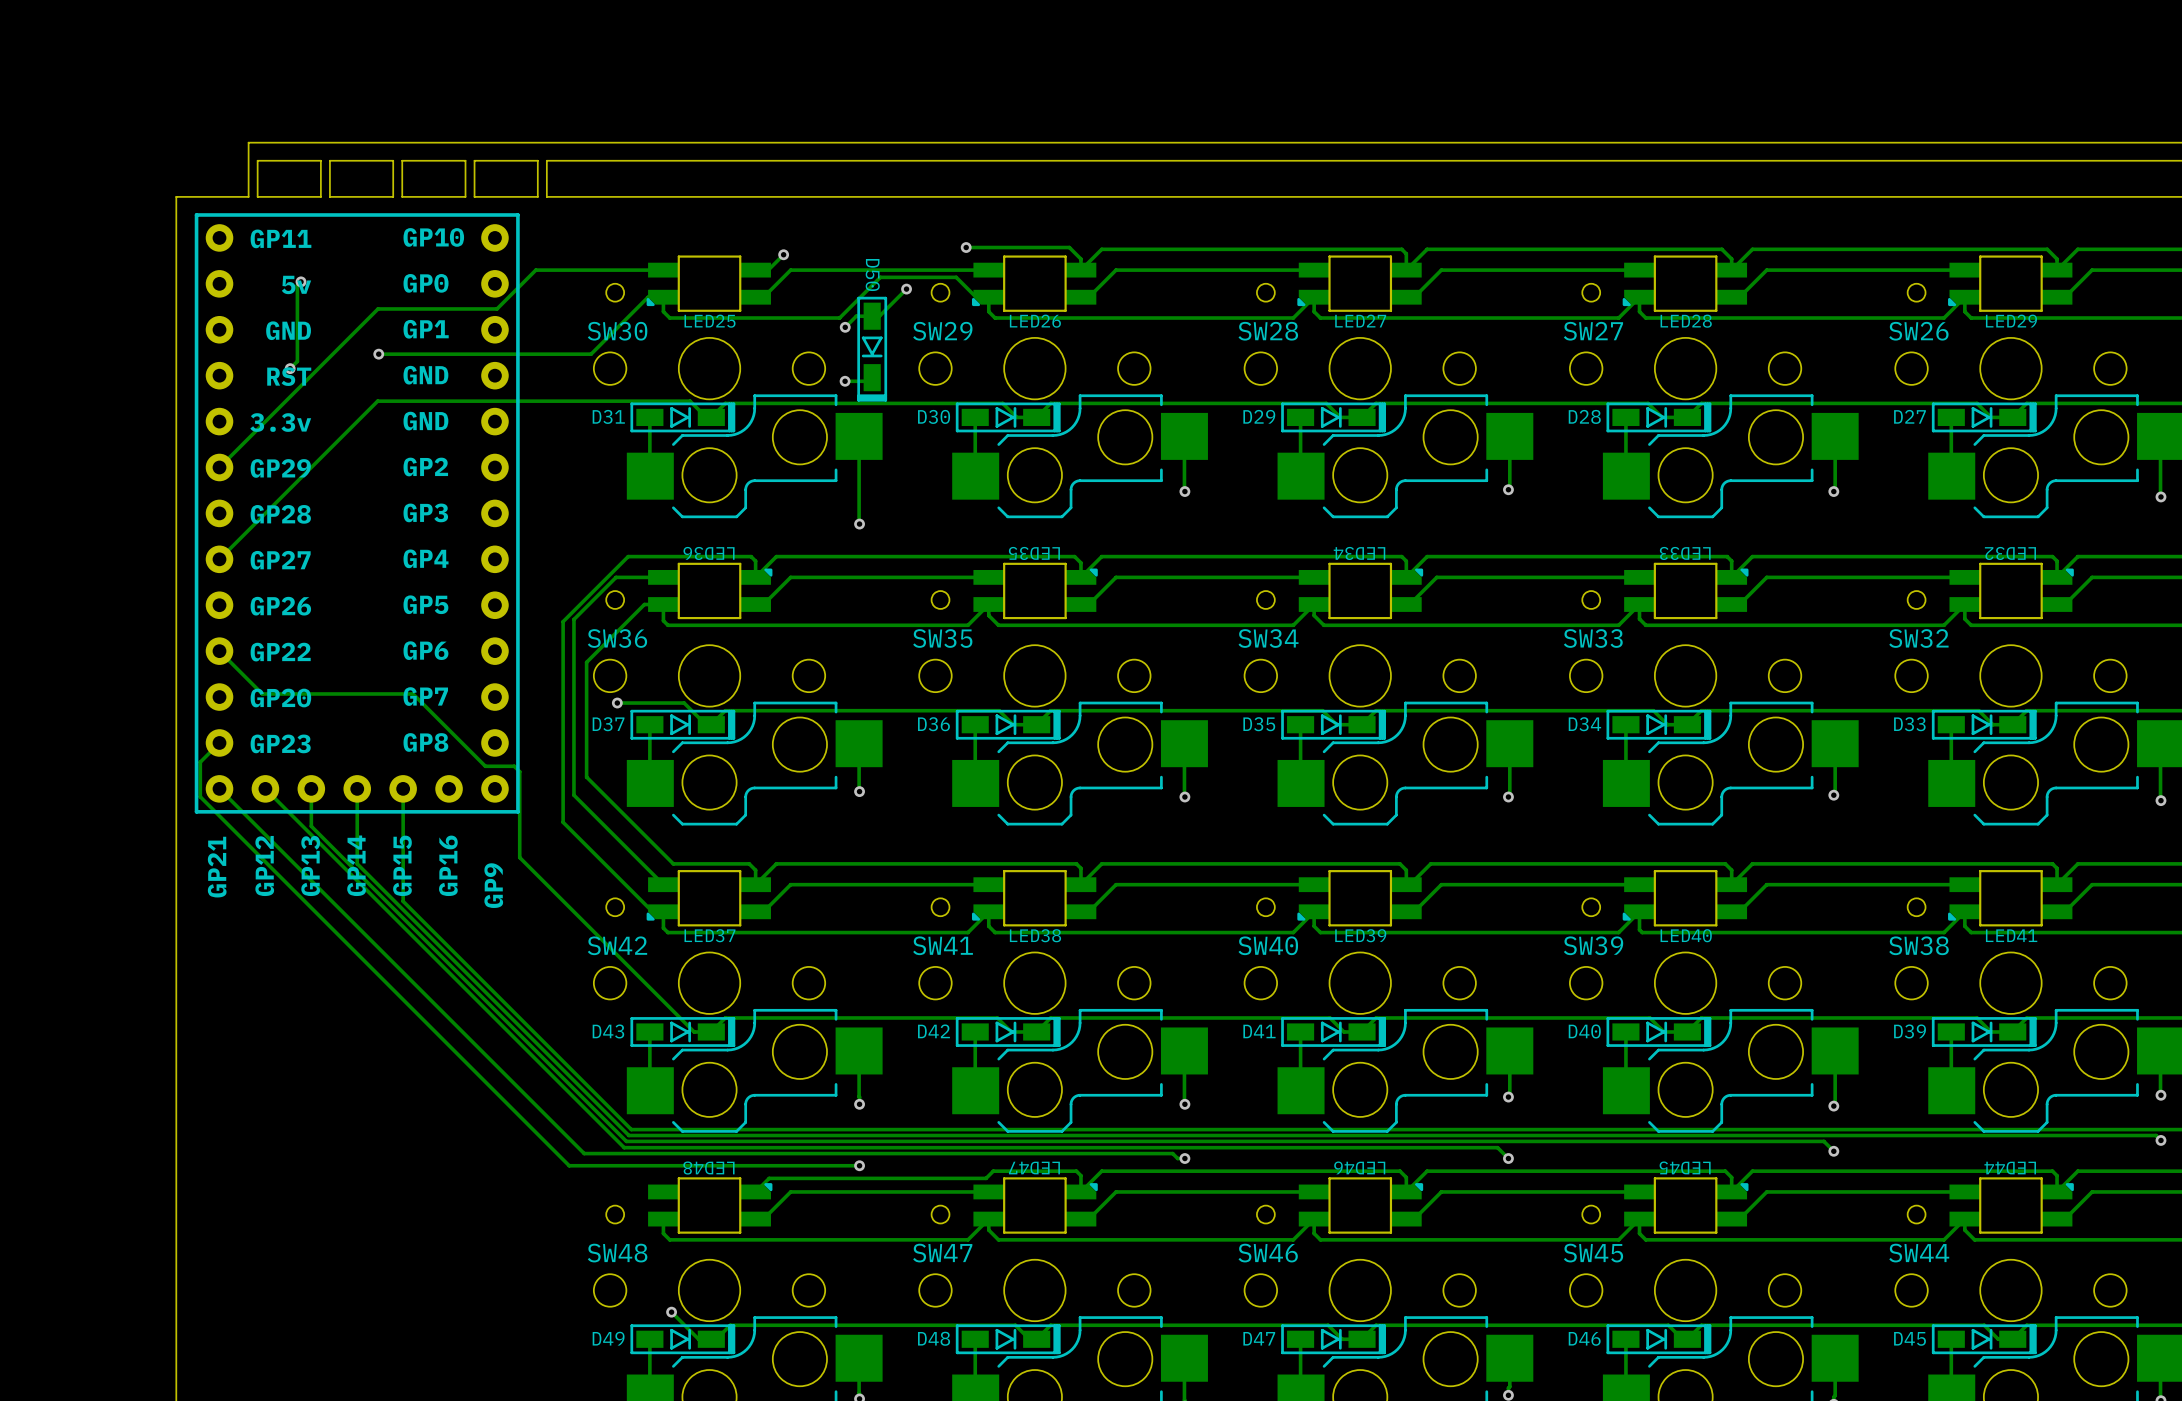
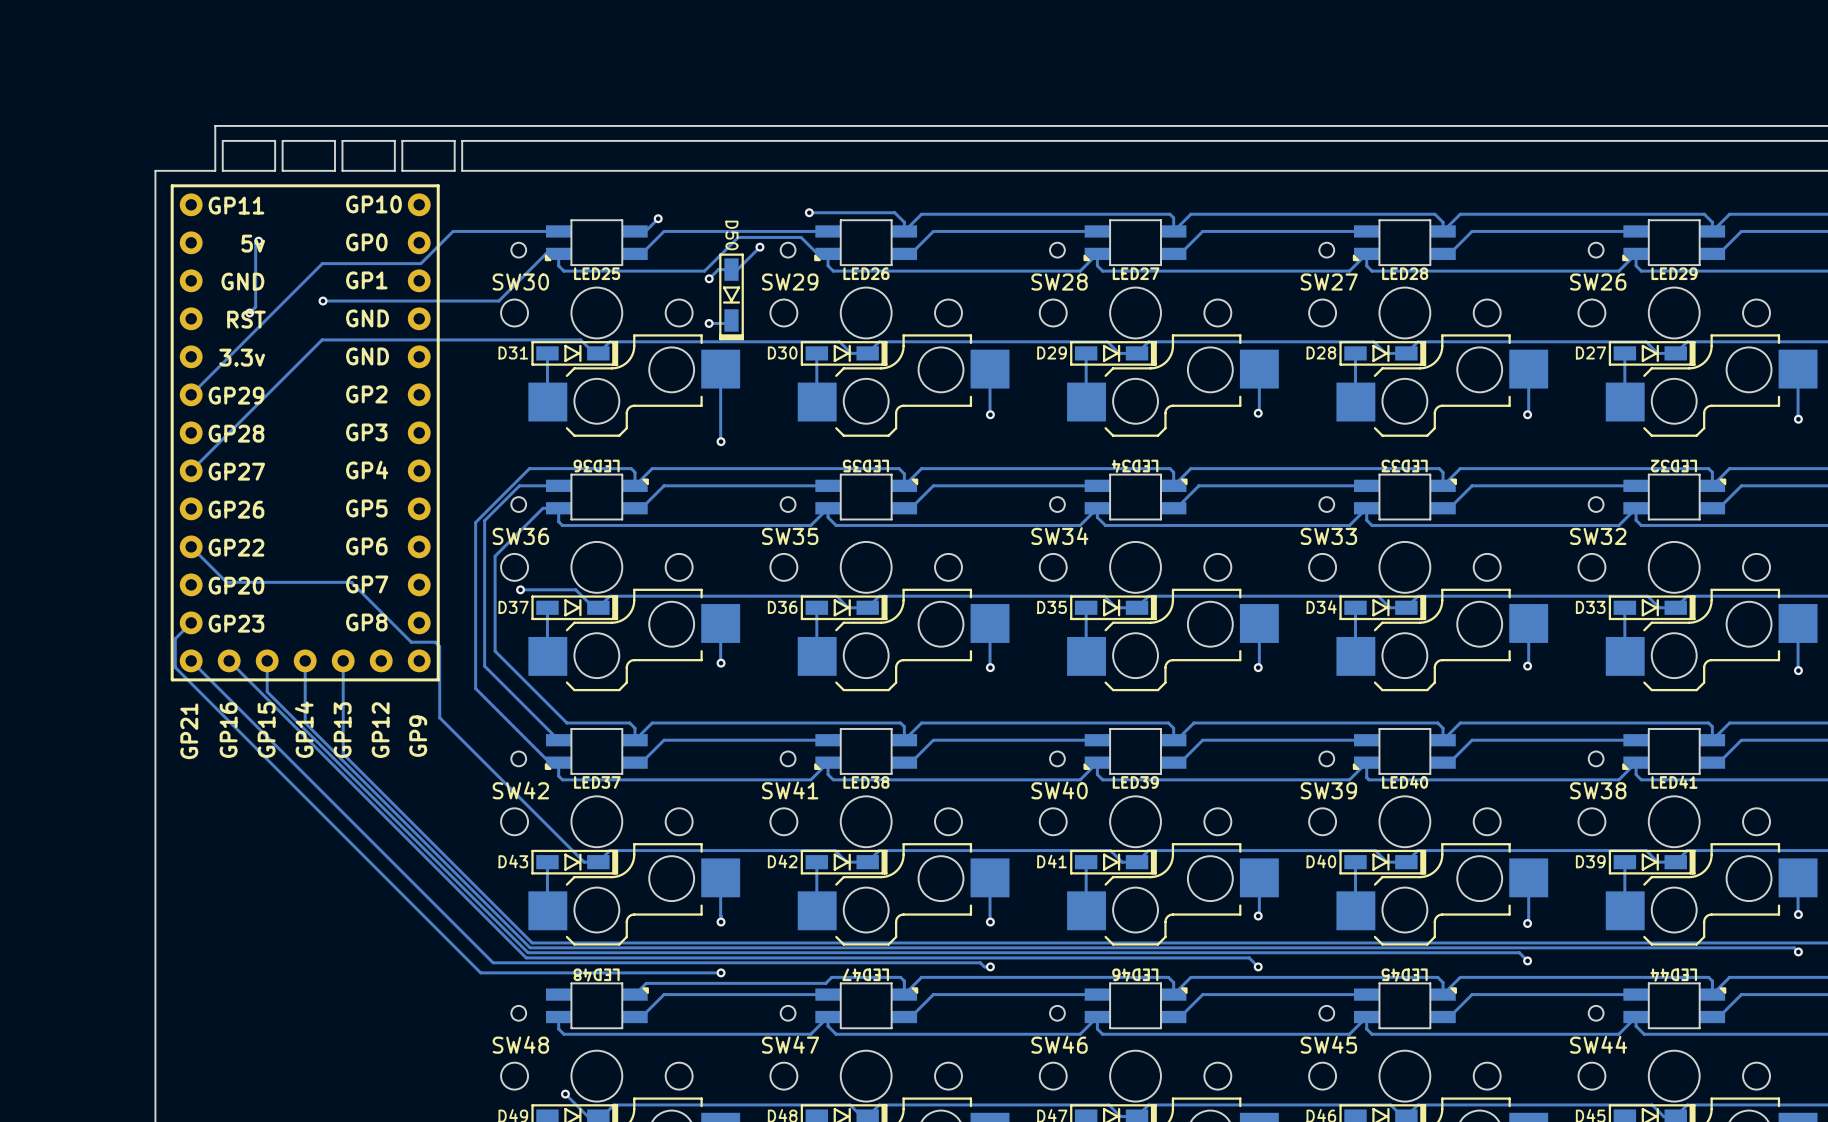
part text: GP12 (264, 865) -> GP16 (228, 730)
part text: GP13 (310, 865) -> GP15 (266, 730)
part text: GP15 (402, 865) -> GP13 (342, 730)
part text: GP16 (448, 865) -> GP12 (380, 730)

